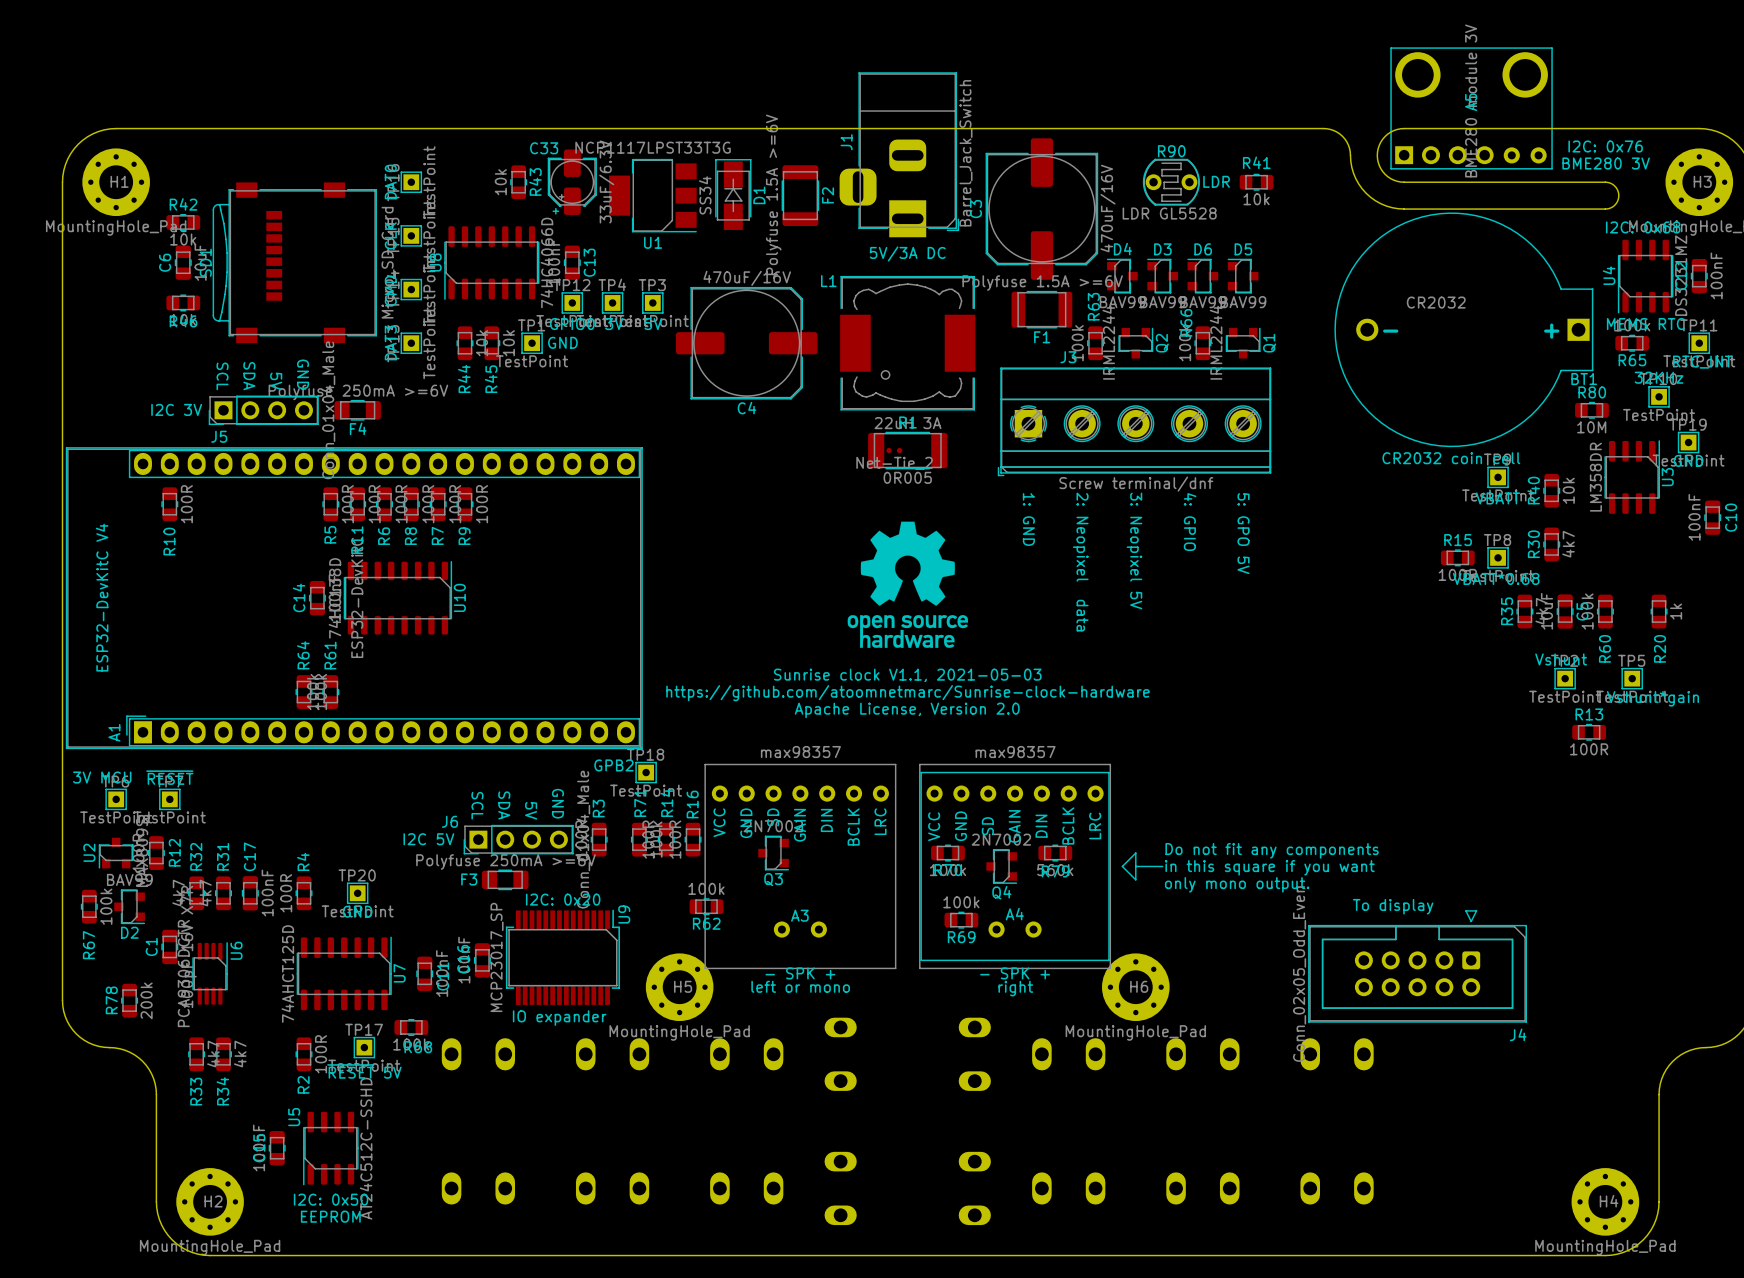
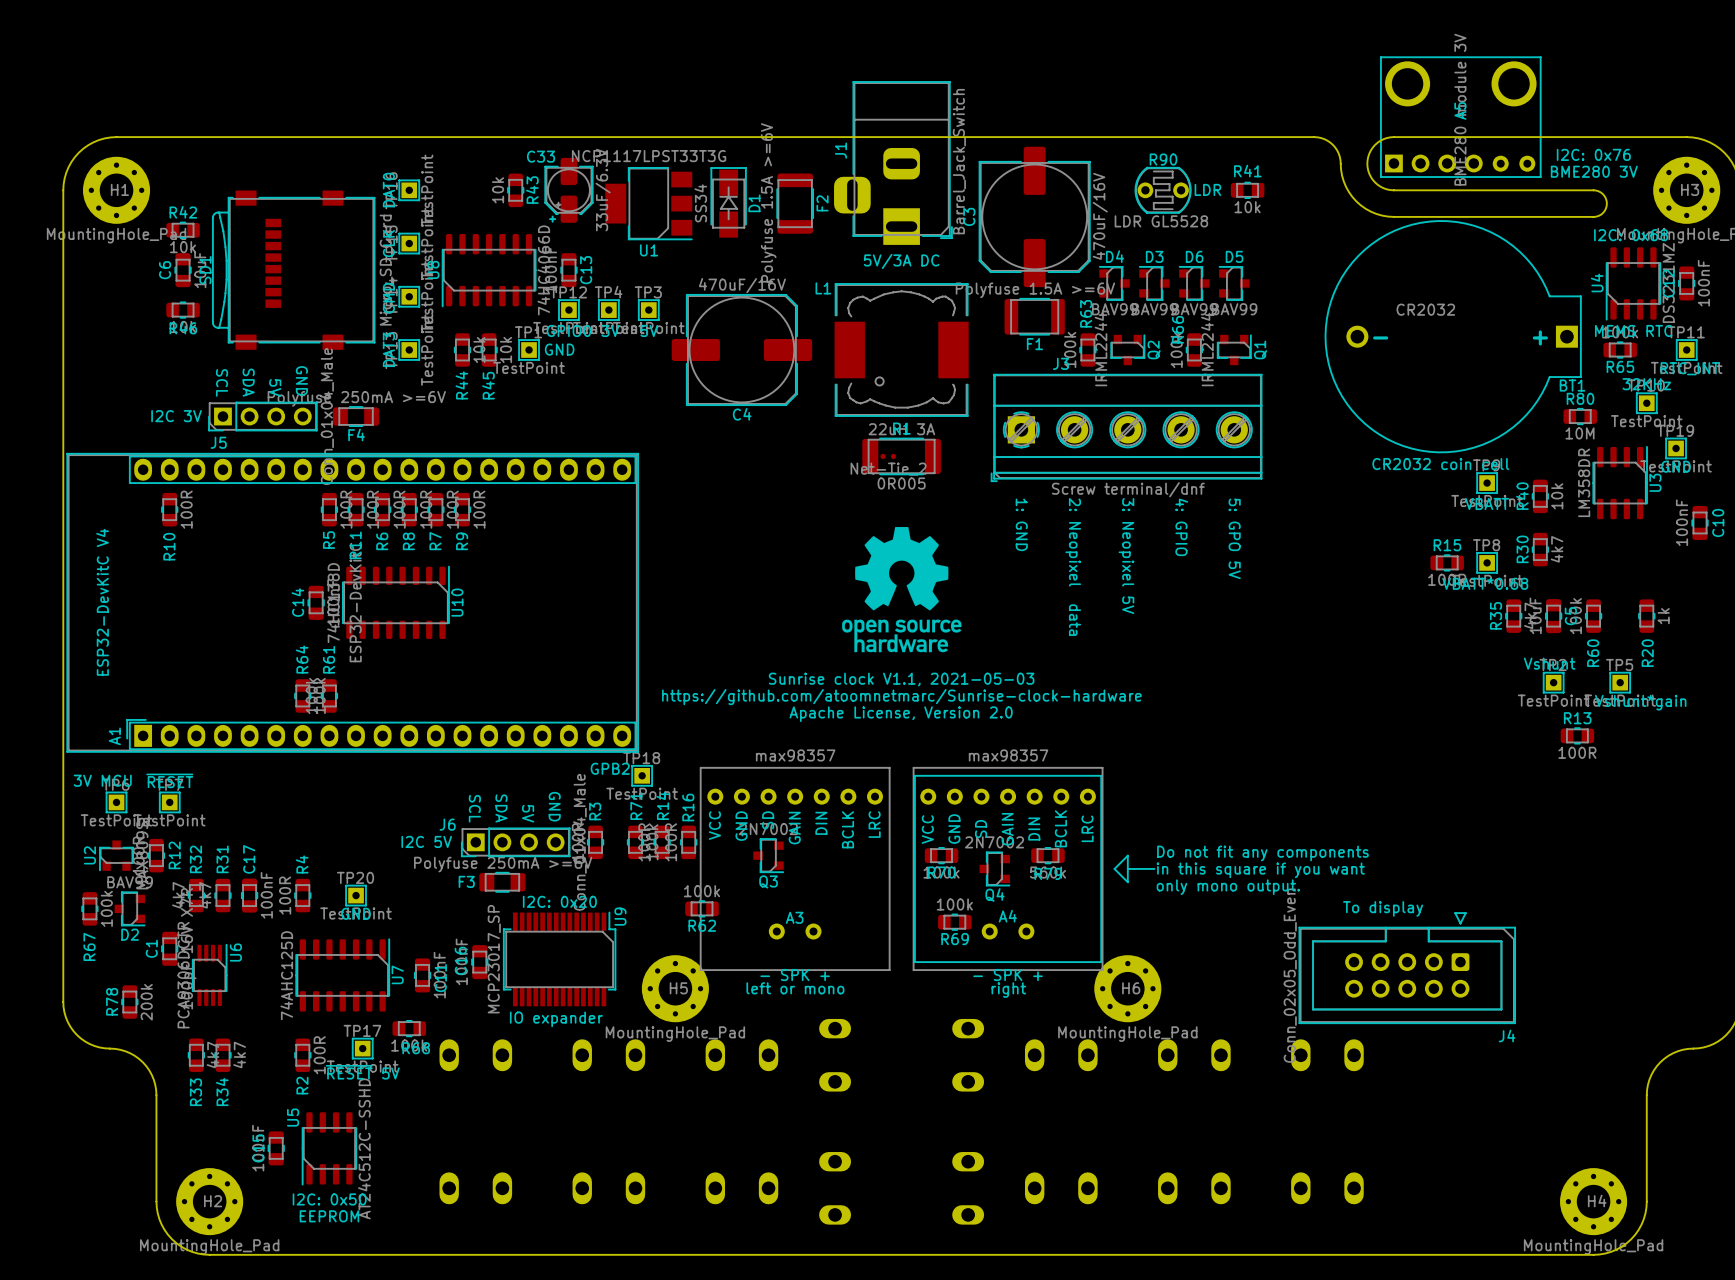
U7 value: 74AHCT125D (287, 974) -> 74AHC125D (286, 975)

